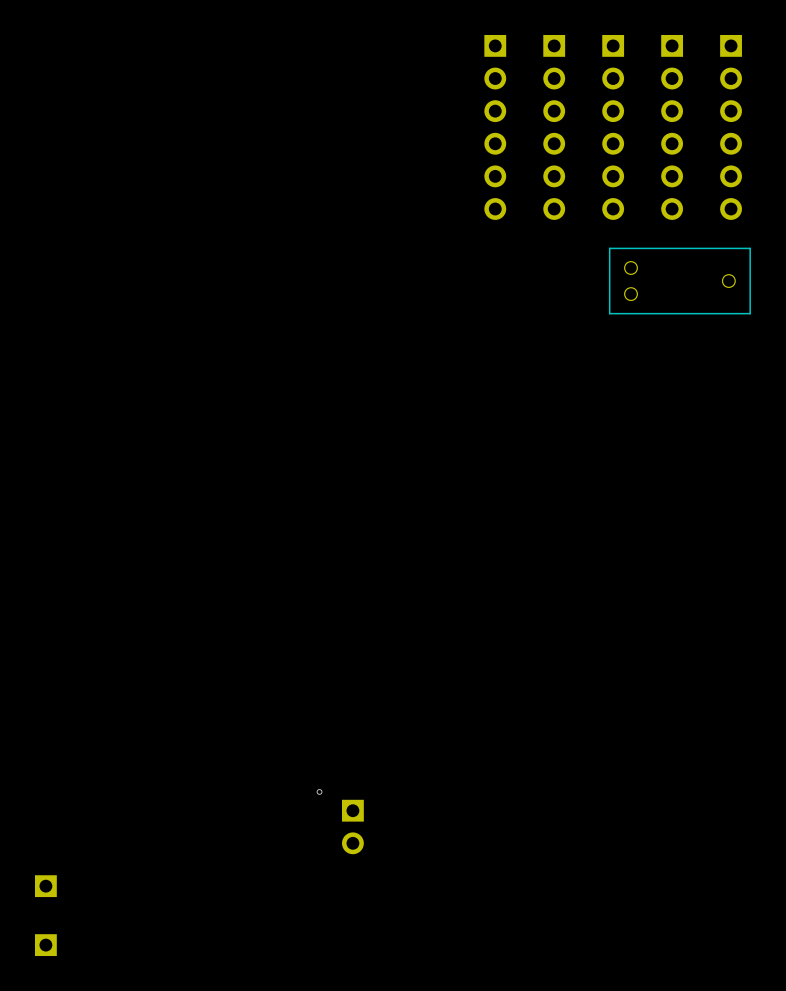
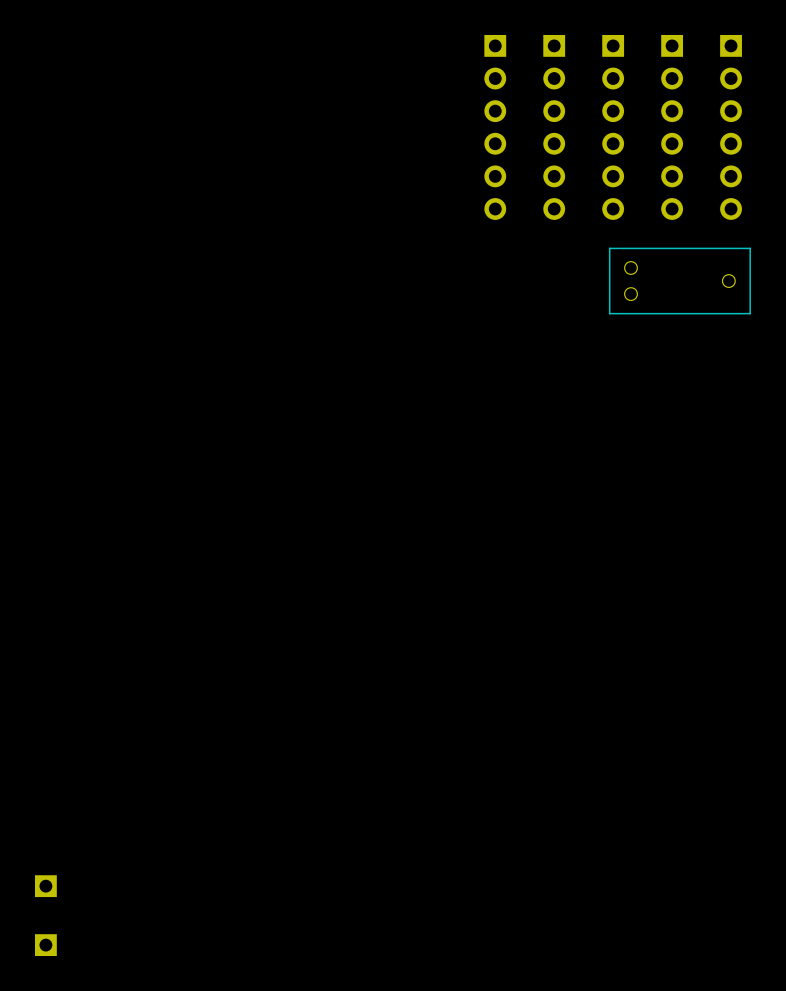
via: (319, 791) -> none
part: (352, 827) -> none

